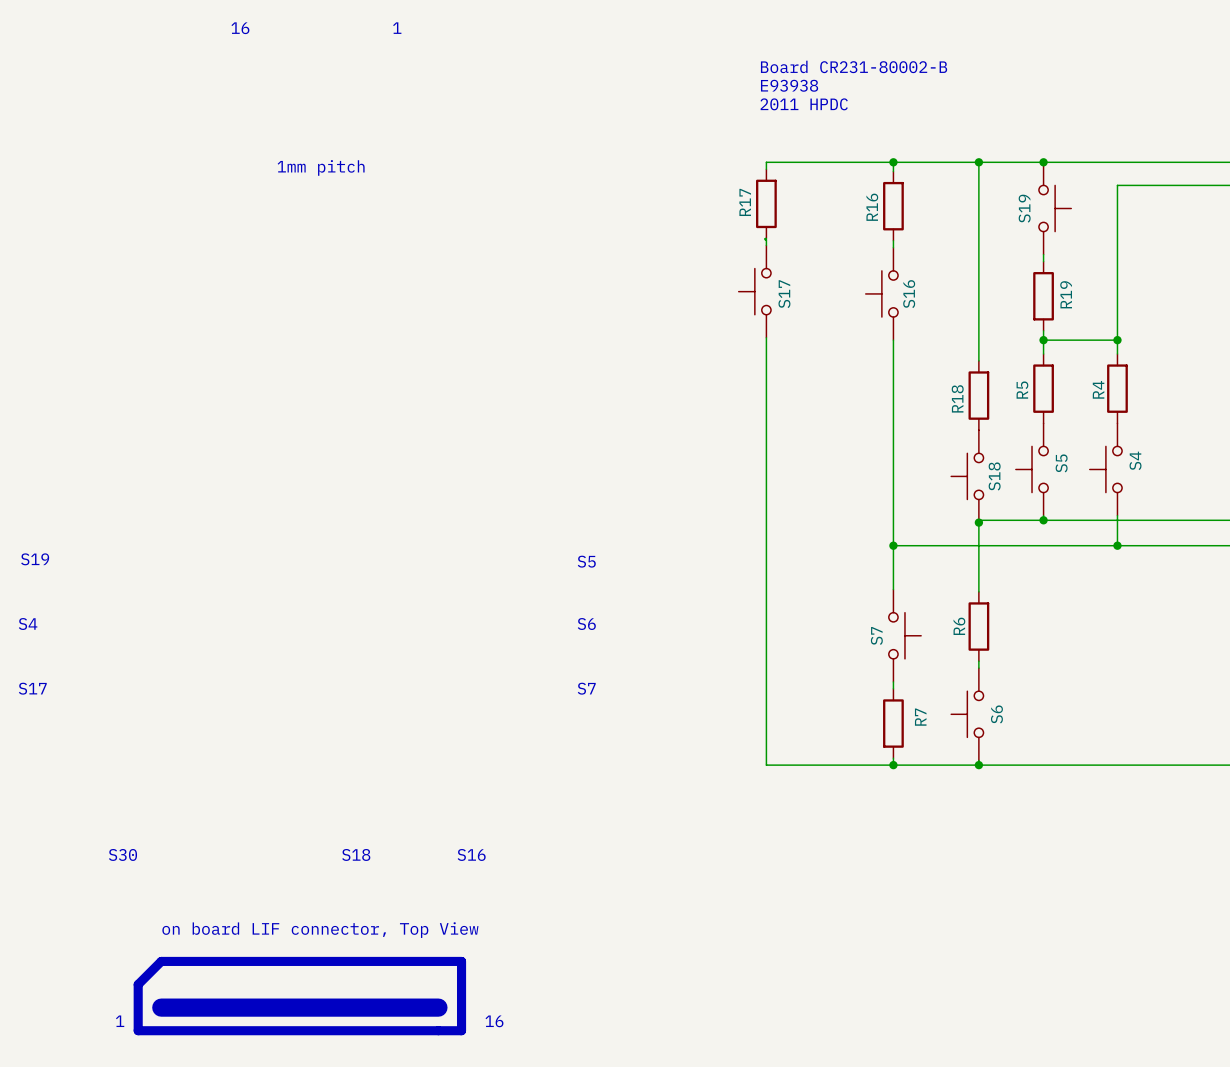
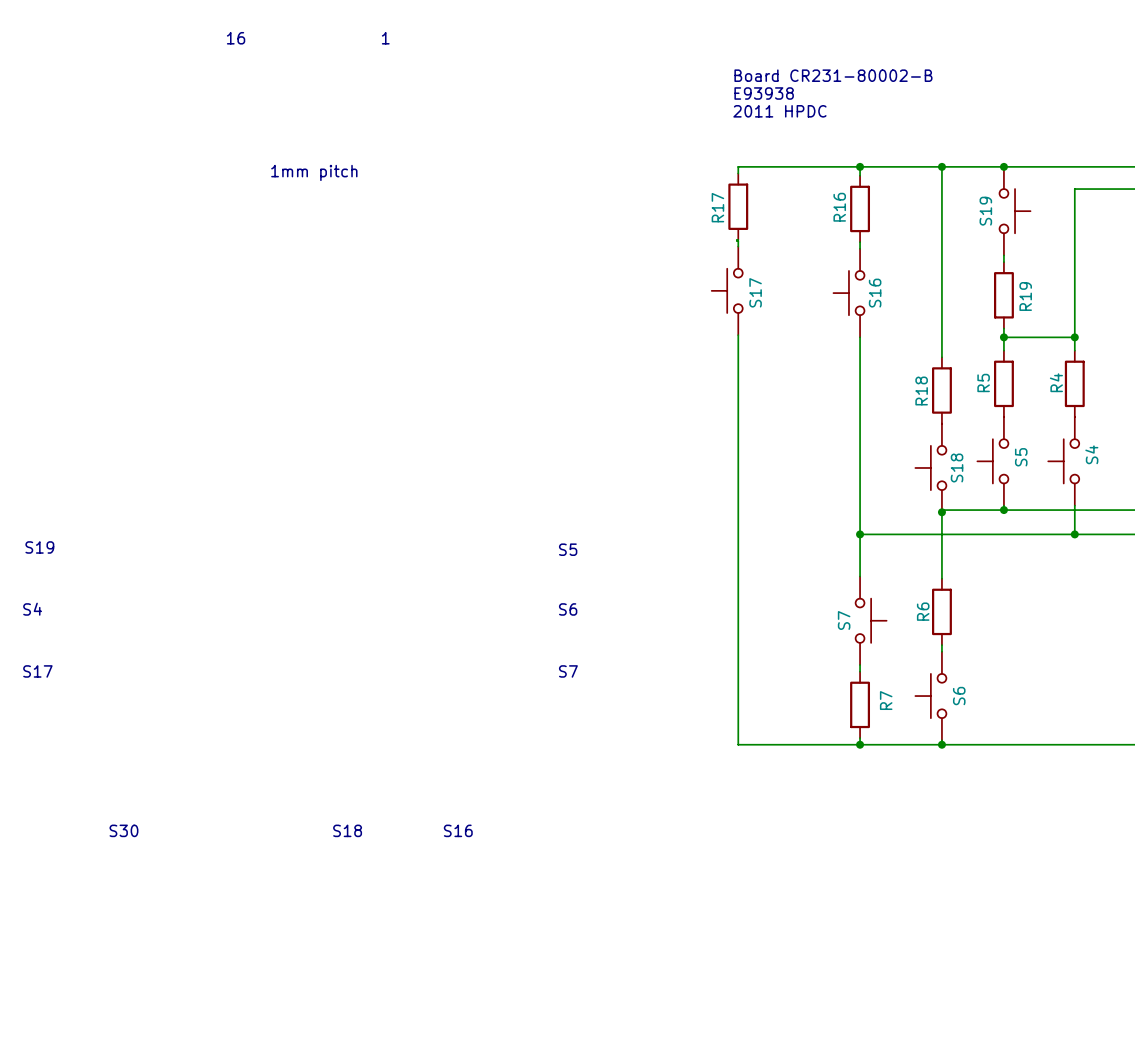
text: on board LIF connector, Top View (320, 930) -> none
line: (161, 961) (138, 984) (138, 1030) (461, 1030) (461, 961) (161, 961) -> none
line: (161, 1007) (438, 1007) -> none
text: 1 (120, 1021) -> none
text: 16 (494, 1021) -> none

